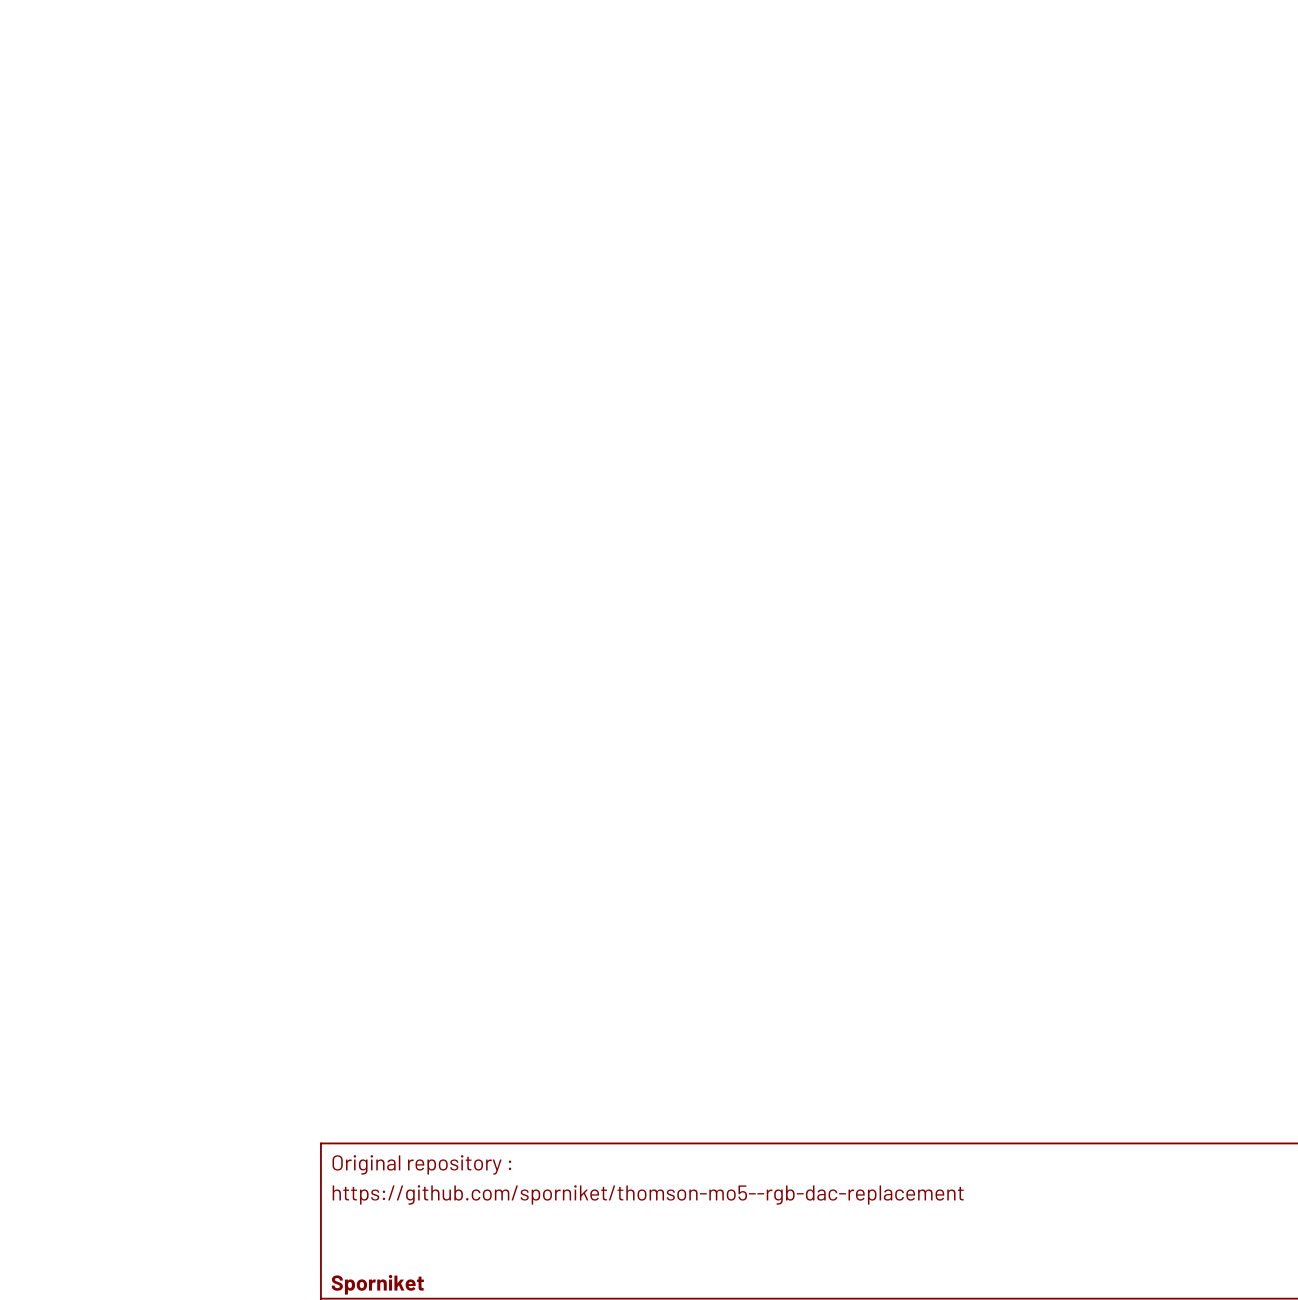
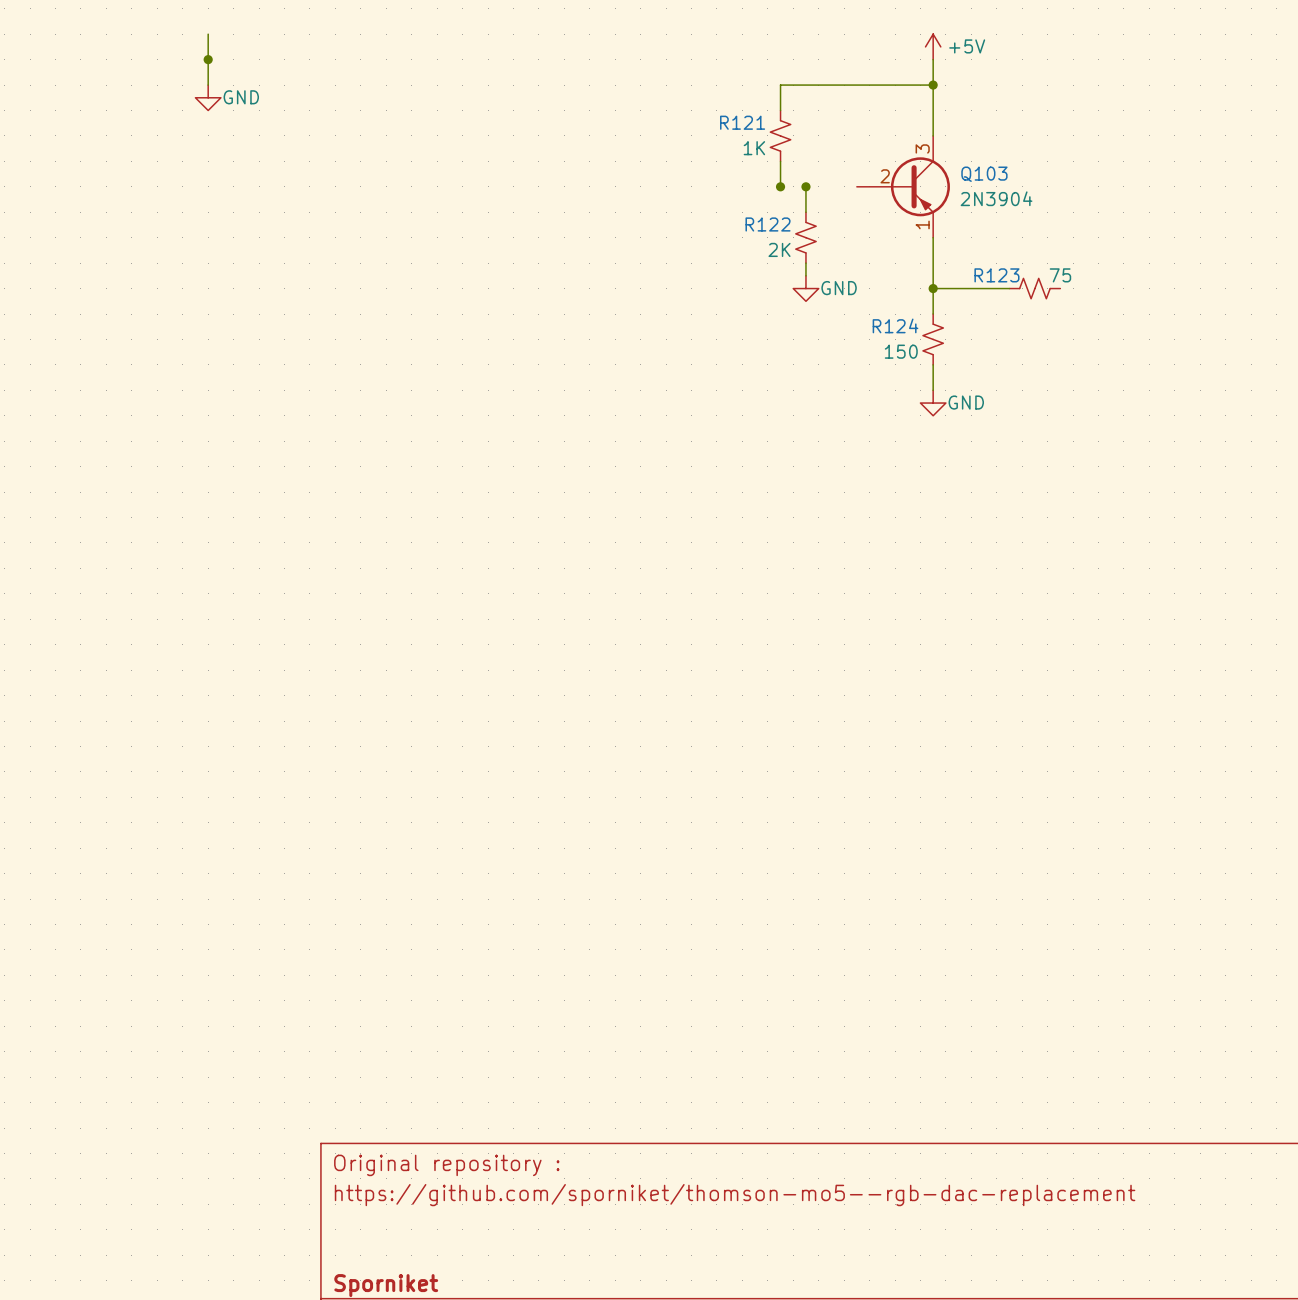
wire: none -> (208, 34) (208, 85)
power symbol: none -> +5V (933, 46)
junction: none -> (208, 59)
wire: none -> (933, 59) (933, 135)
wire: none -> (933, 85) (780, 85) (780, 110)
junction: none -> (933, 85)
power symbol: none -> GND (208, 97)
R121: none -> 1K (780, 135)
wire: none -> (780, 161) (780, 186)
junction: none -> (780, 186)
wire: none -> (805, 186) (805, 212)
junction: none -> (805, 186)
Q103: none -> 2N3904 (903, 186)
R122: none -> 2K (805, 237)
wire: none -> (933, 237) (933, 314)
wire: none -> (805, 263) (805, 275)
power symbol: none -> GND (805, 288)
wire: none -> (933, 288) (1009, 288)
junction: none -> (933, 288)
R123: none -> 75 (1034, 288)
R124: none -> 150 (933, 339)
wire: none -> (933, 364) (933, 390)
power symbol: none -> GND (933, 403)

